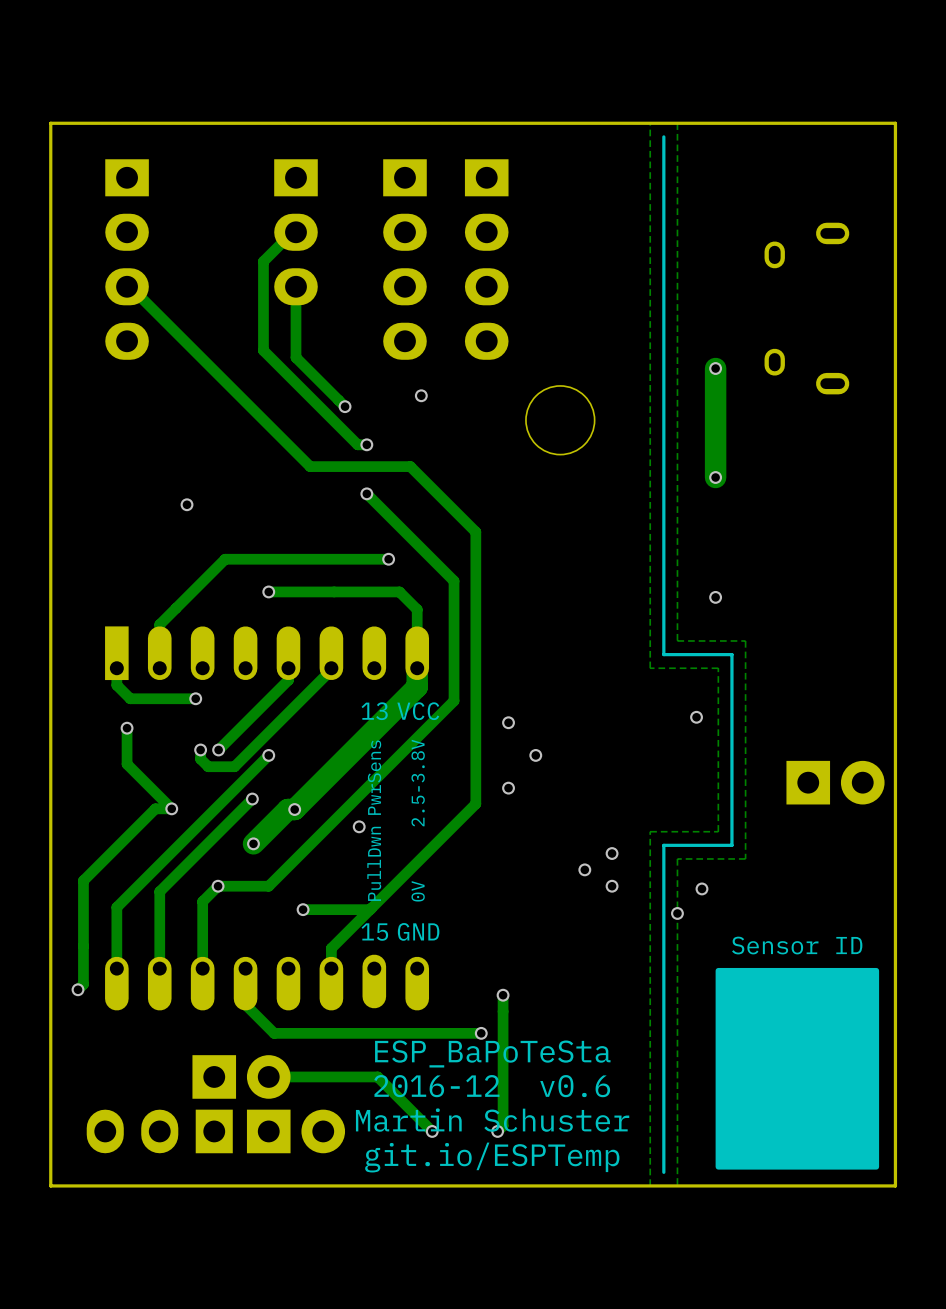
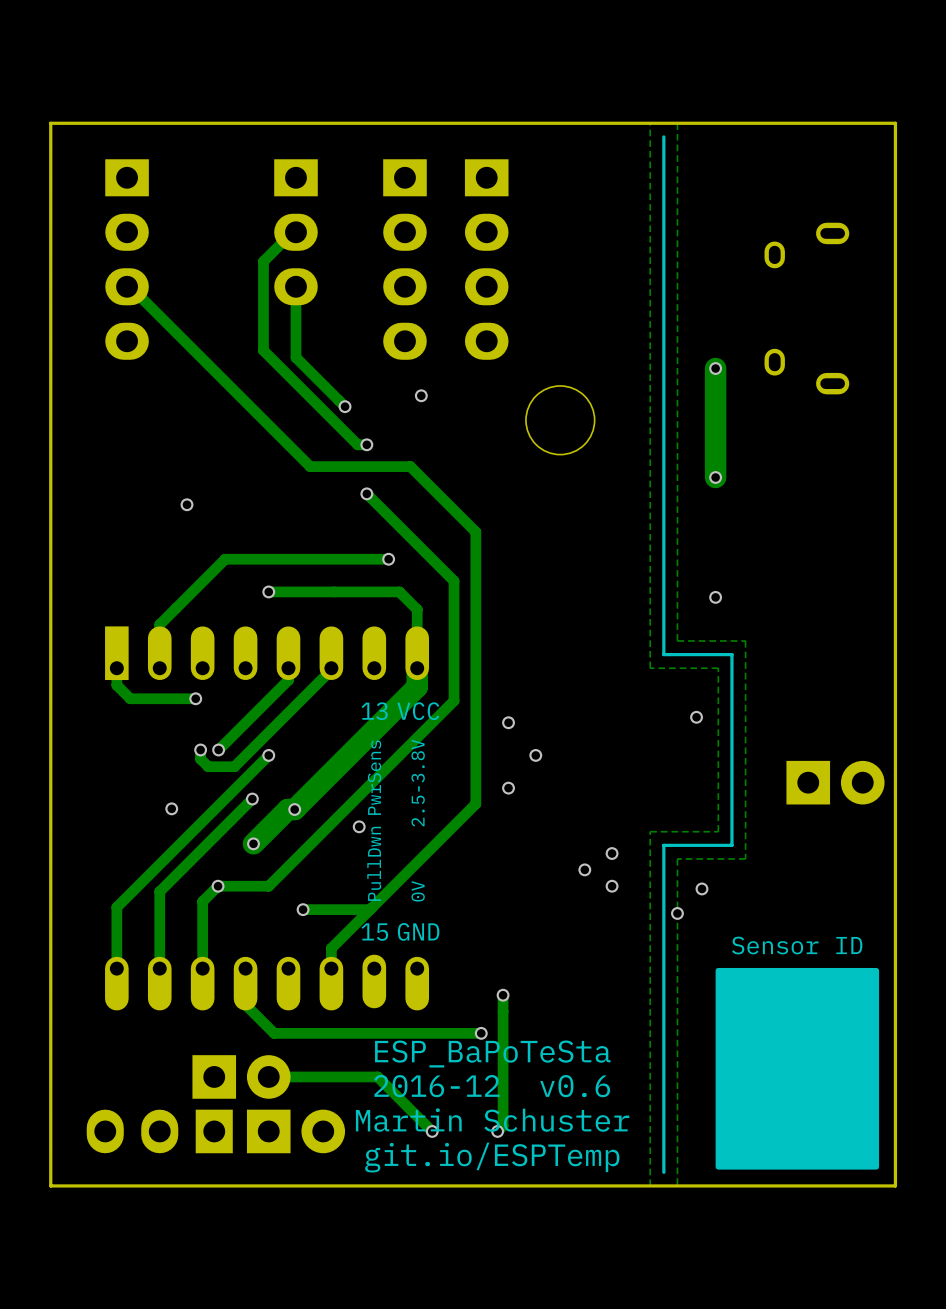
track: (127, 728) (127, 764) (171, 808) (155, 808) (83, 880) (83, 984) (78, 989) -> none
via: (127, 728) -> none
via: (78, 989) -> none

